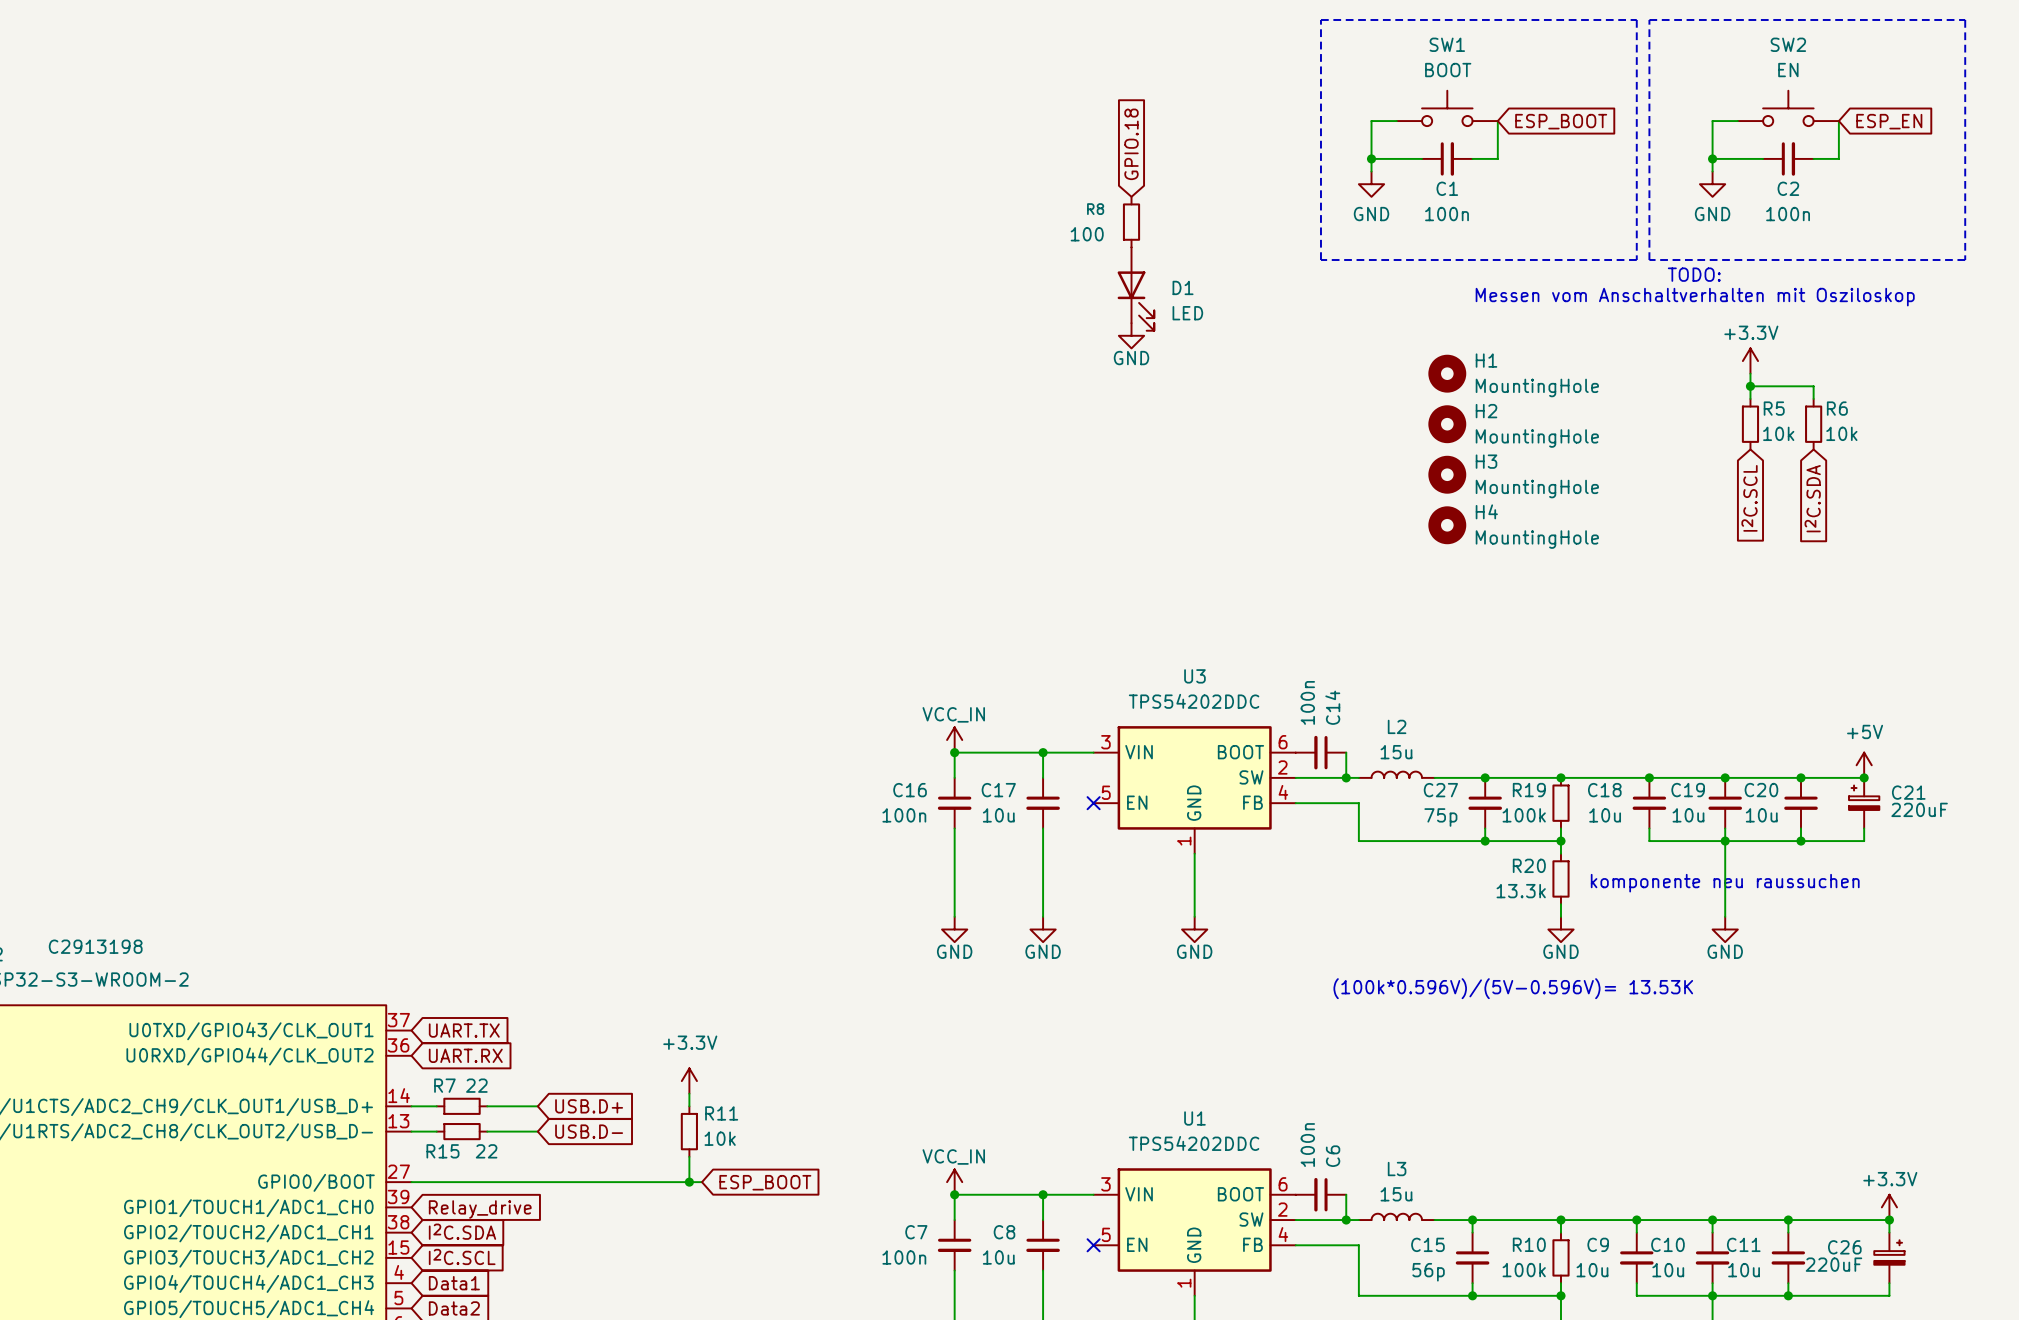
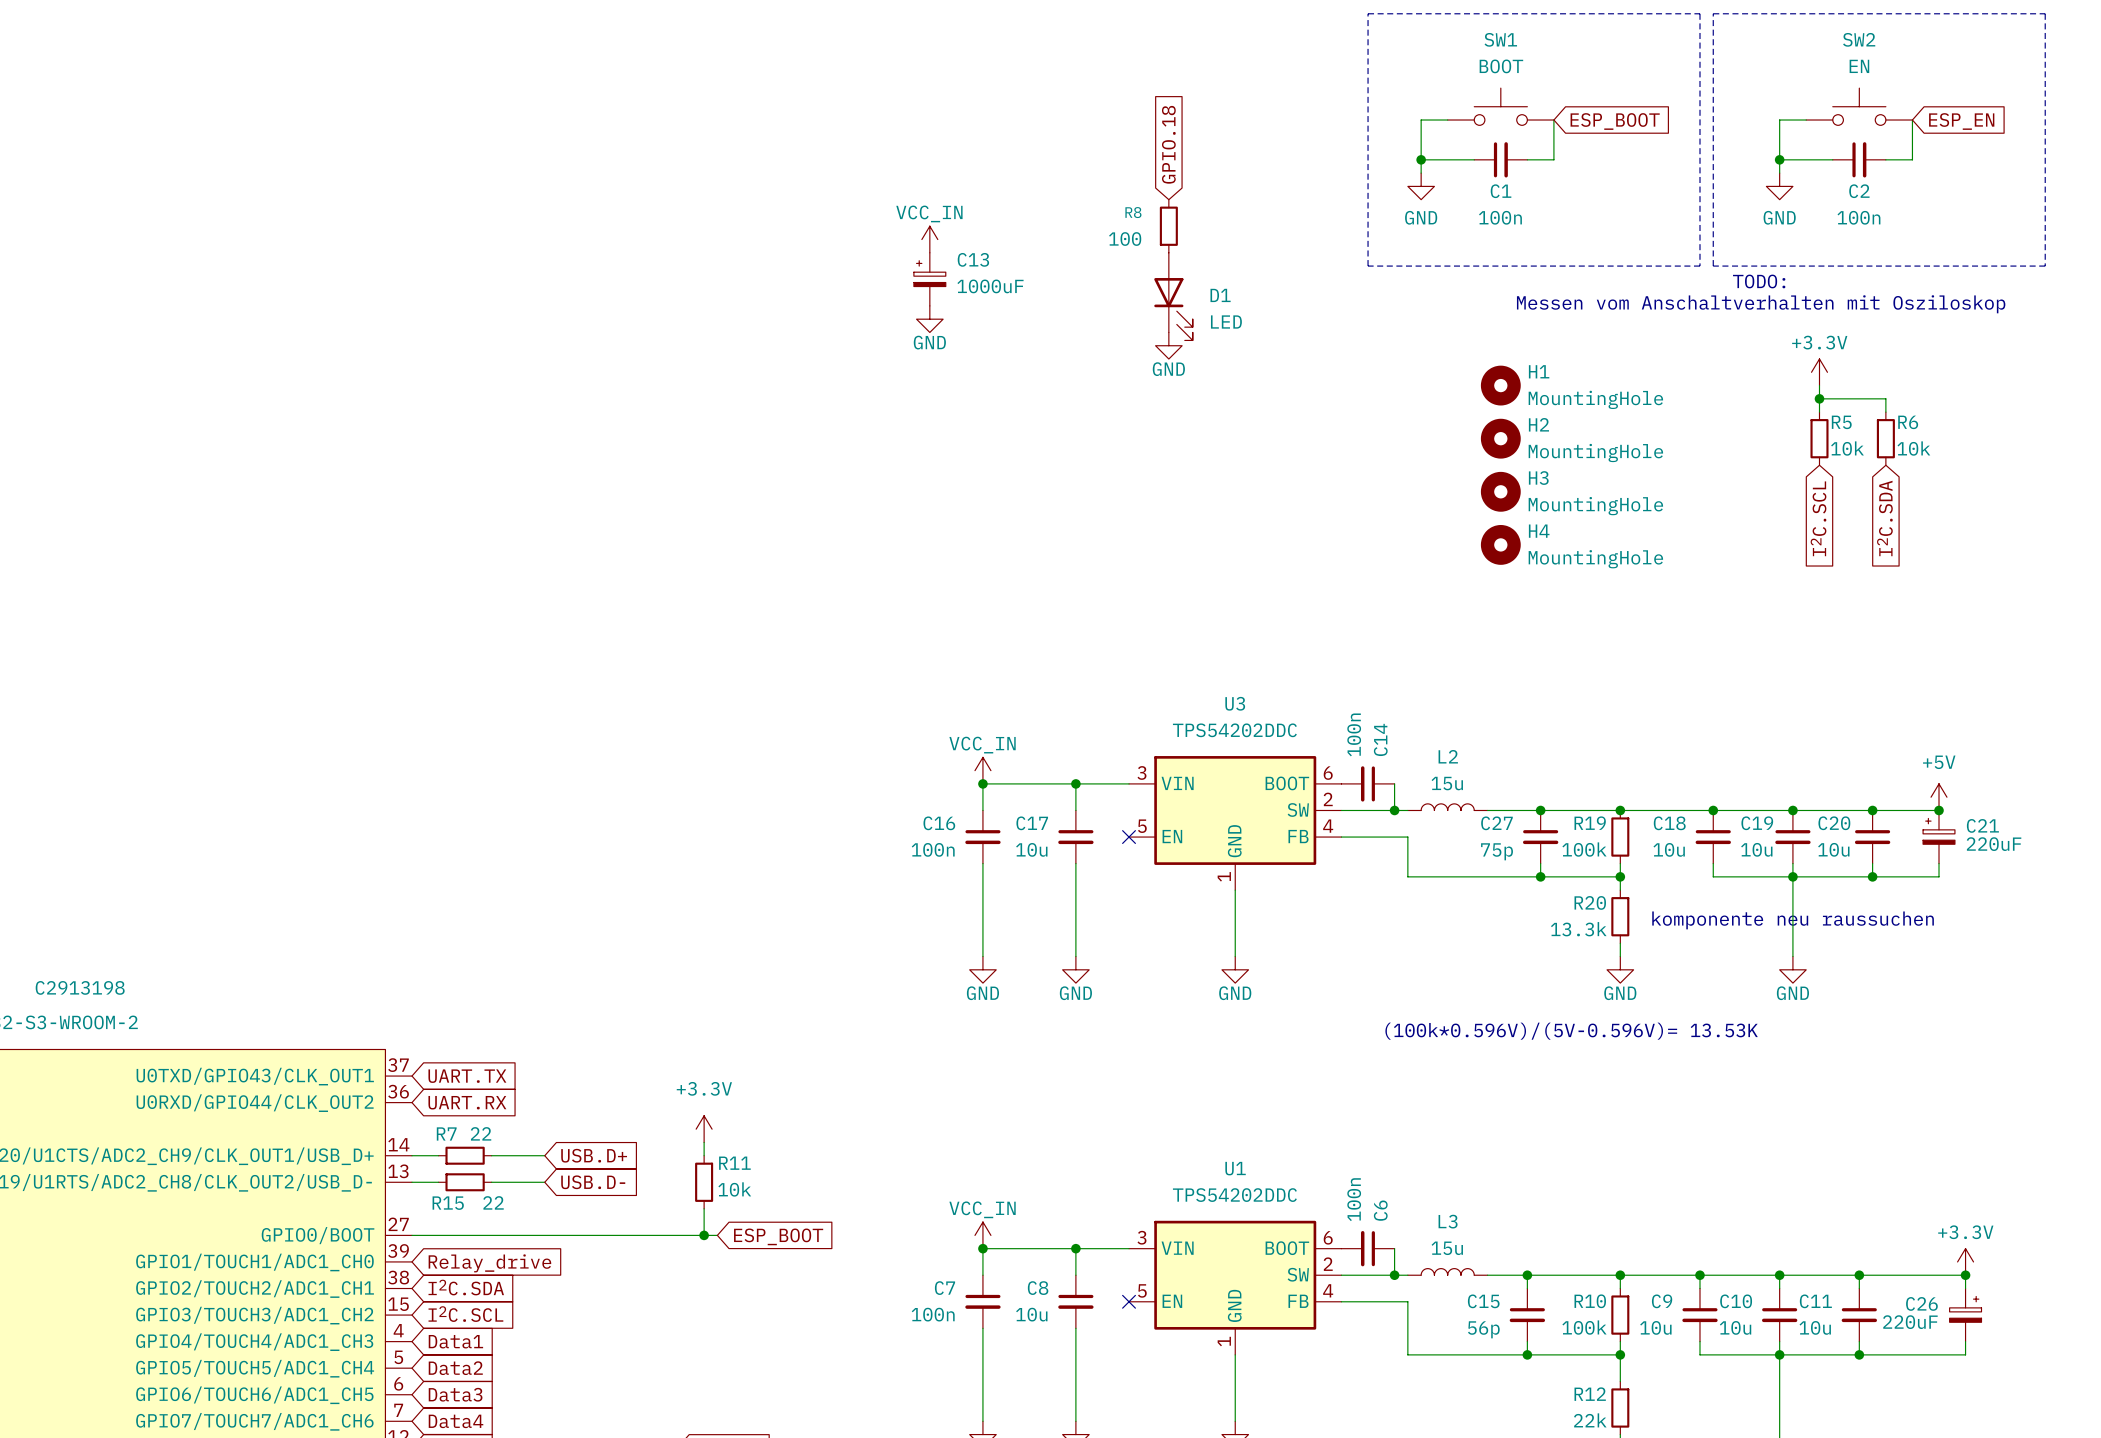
power symbol: none -> VCC_IN (929, 239)
C13: none -> 1000uF (929, 279)
power symbol: none -> GND (929, 319)

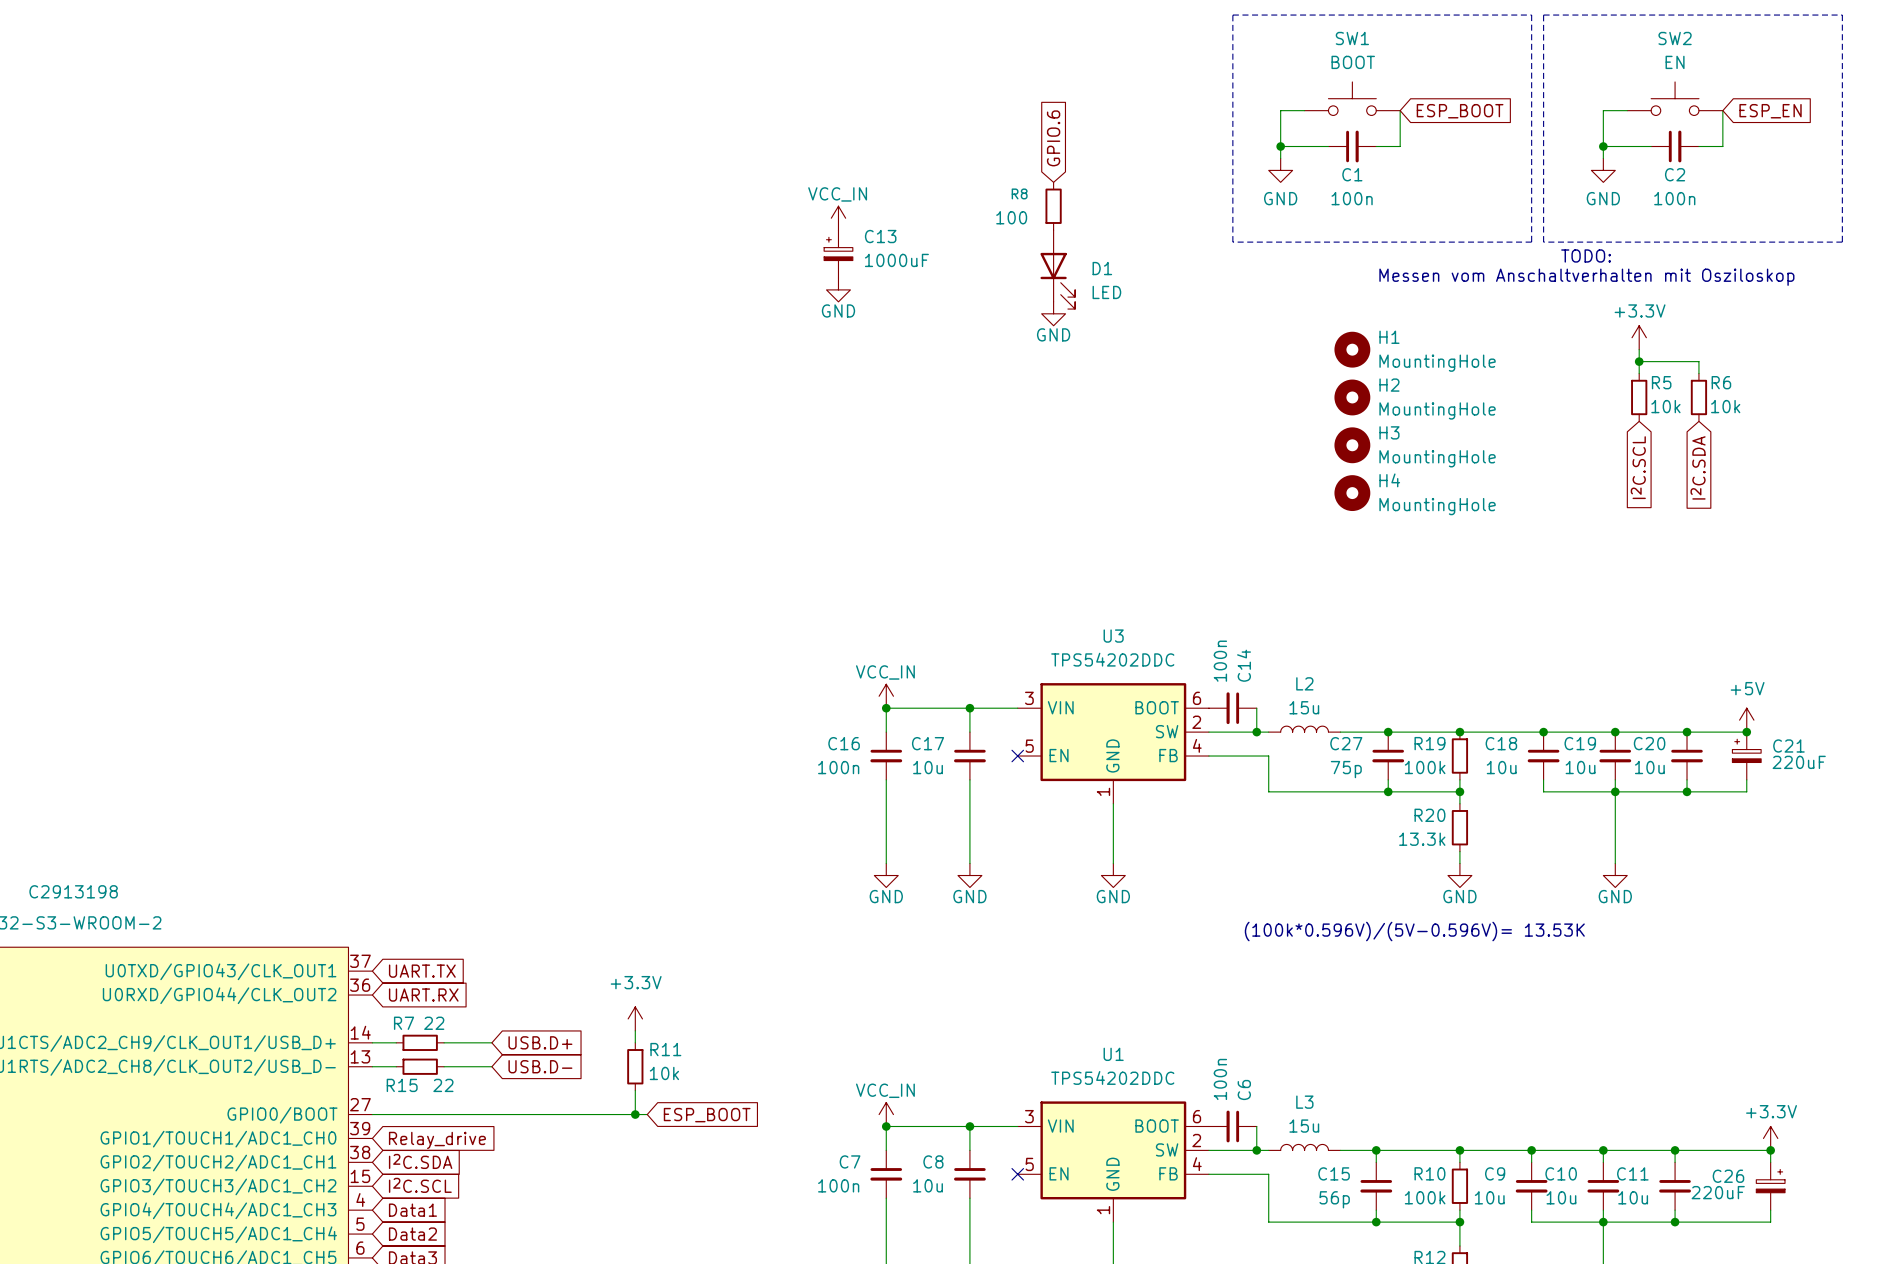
global label: GPIO.18 (1168, 144) -> GPIO.6 (1053, 138)
text: komponente neu raussuchen (1793, 920) -> none

